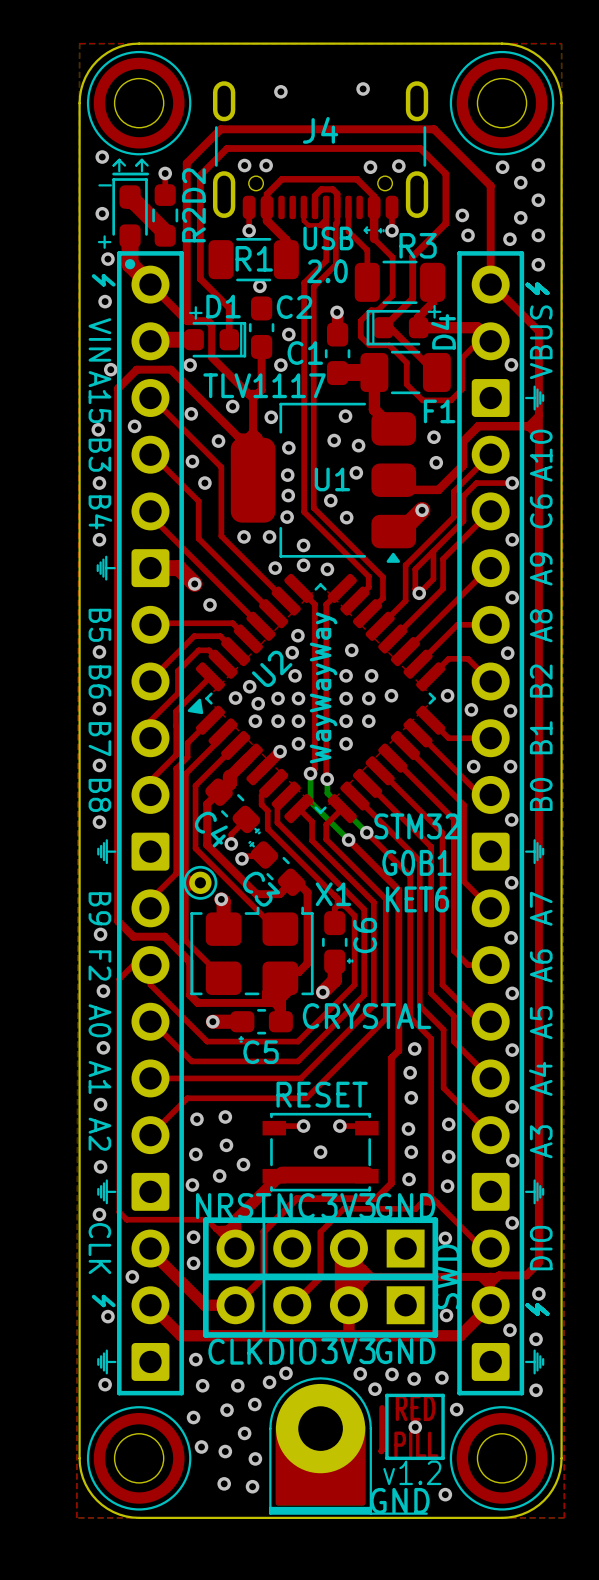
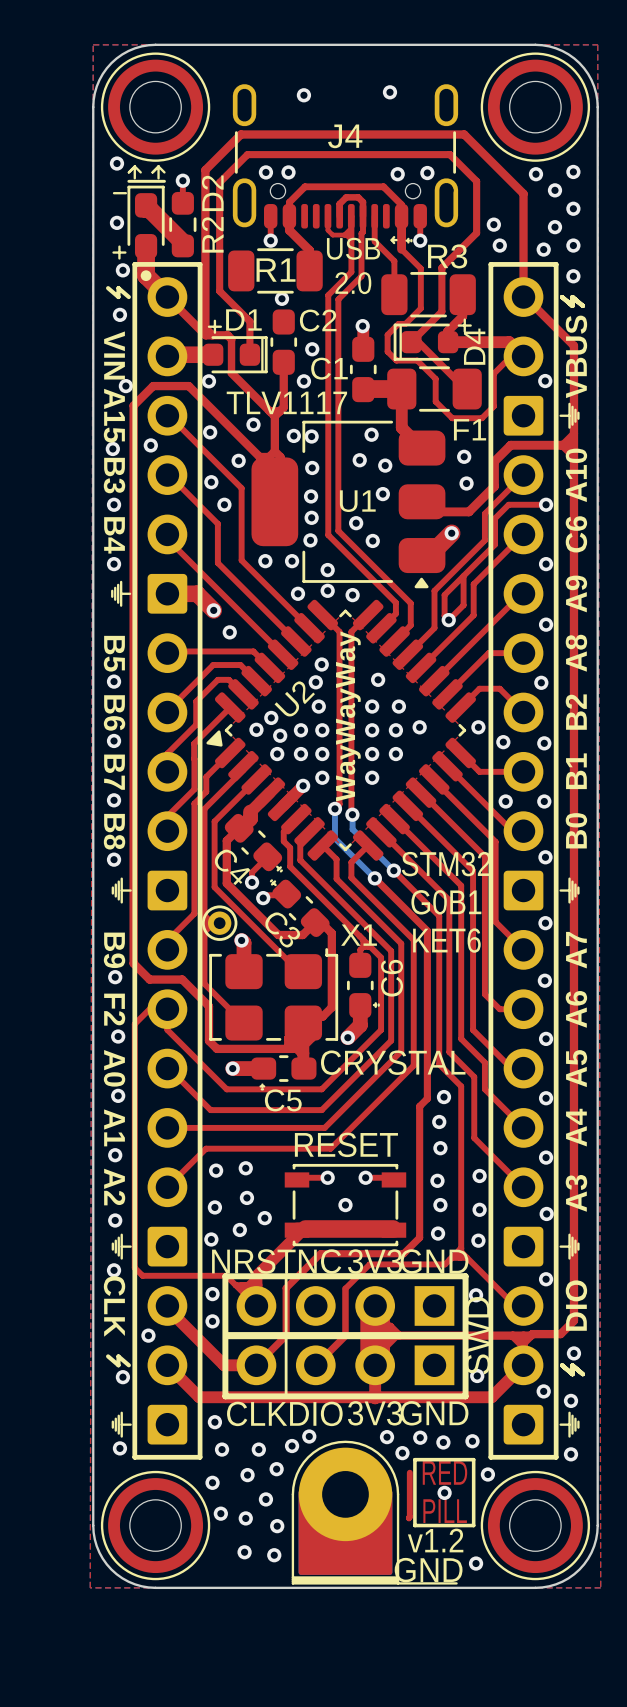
via: none -> (311, 436)

